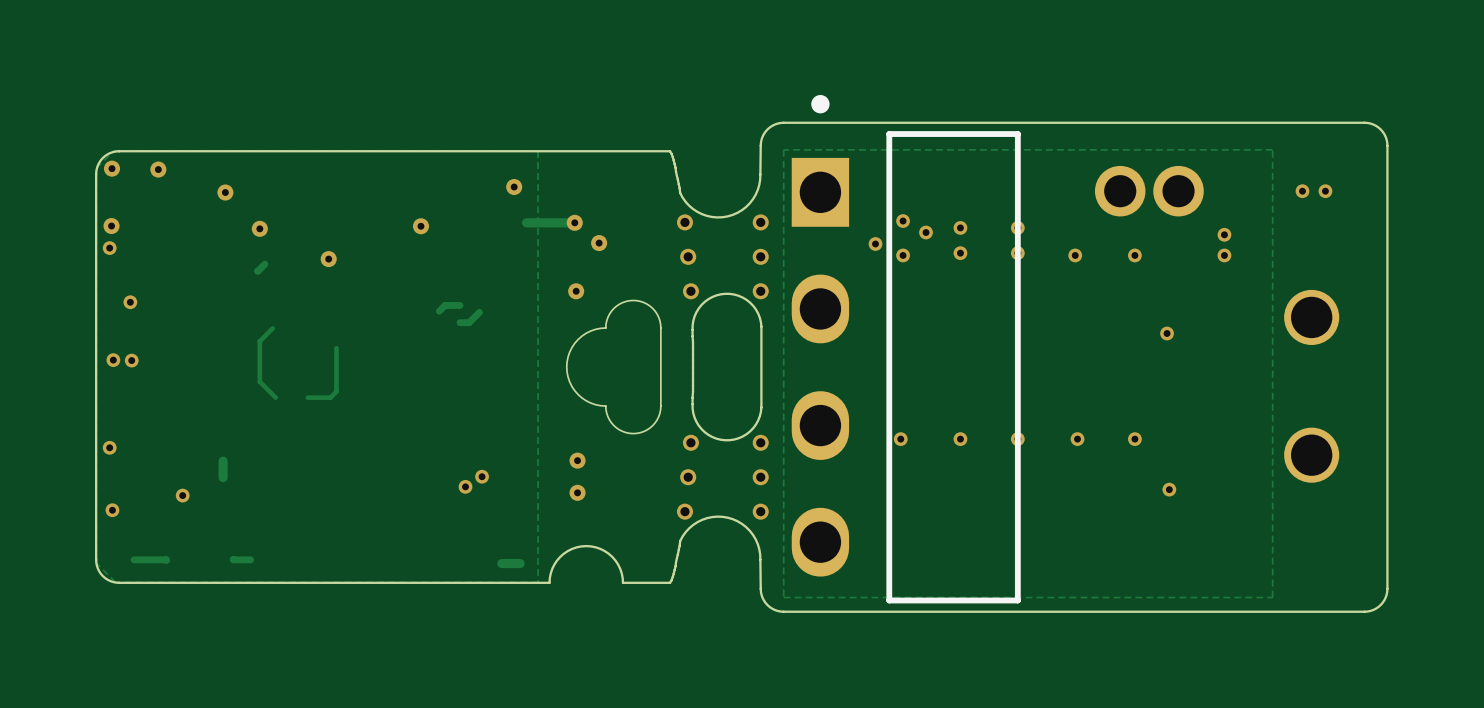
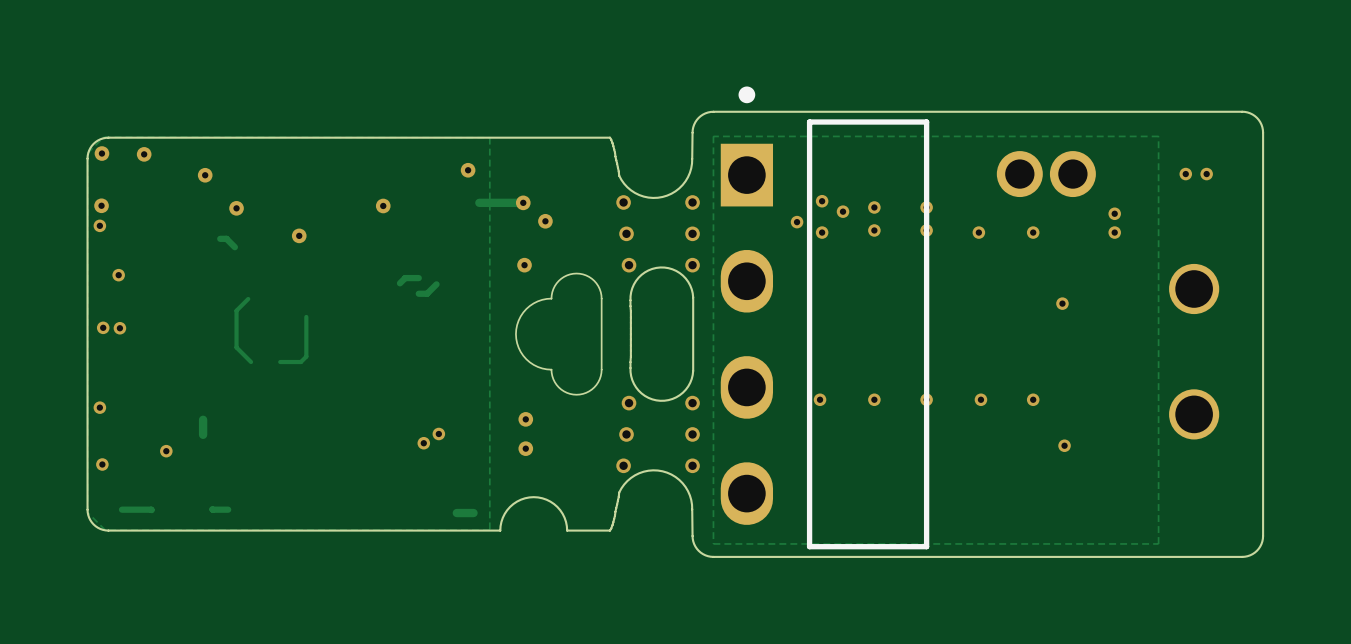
track: (264, 264) (257, 271) -> (220, 238) (226, 238) (234, 247)

